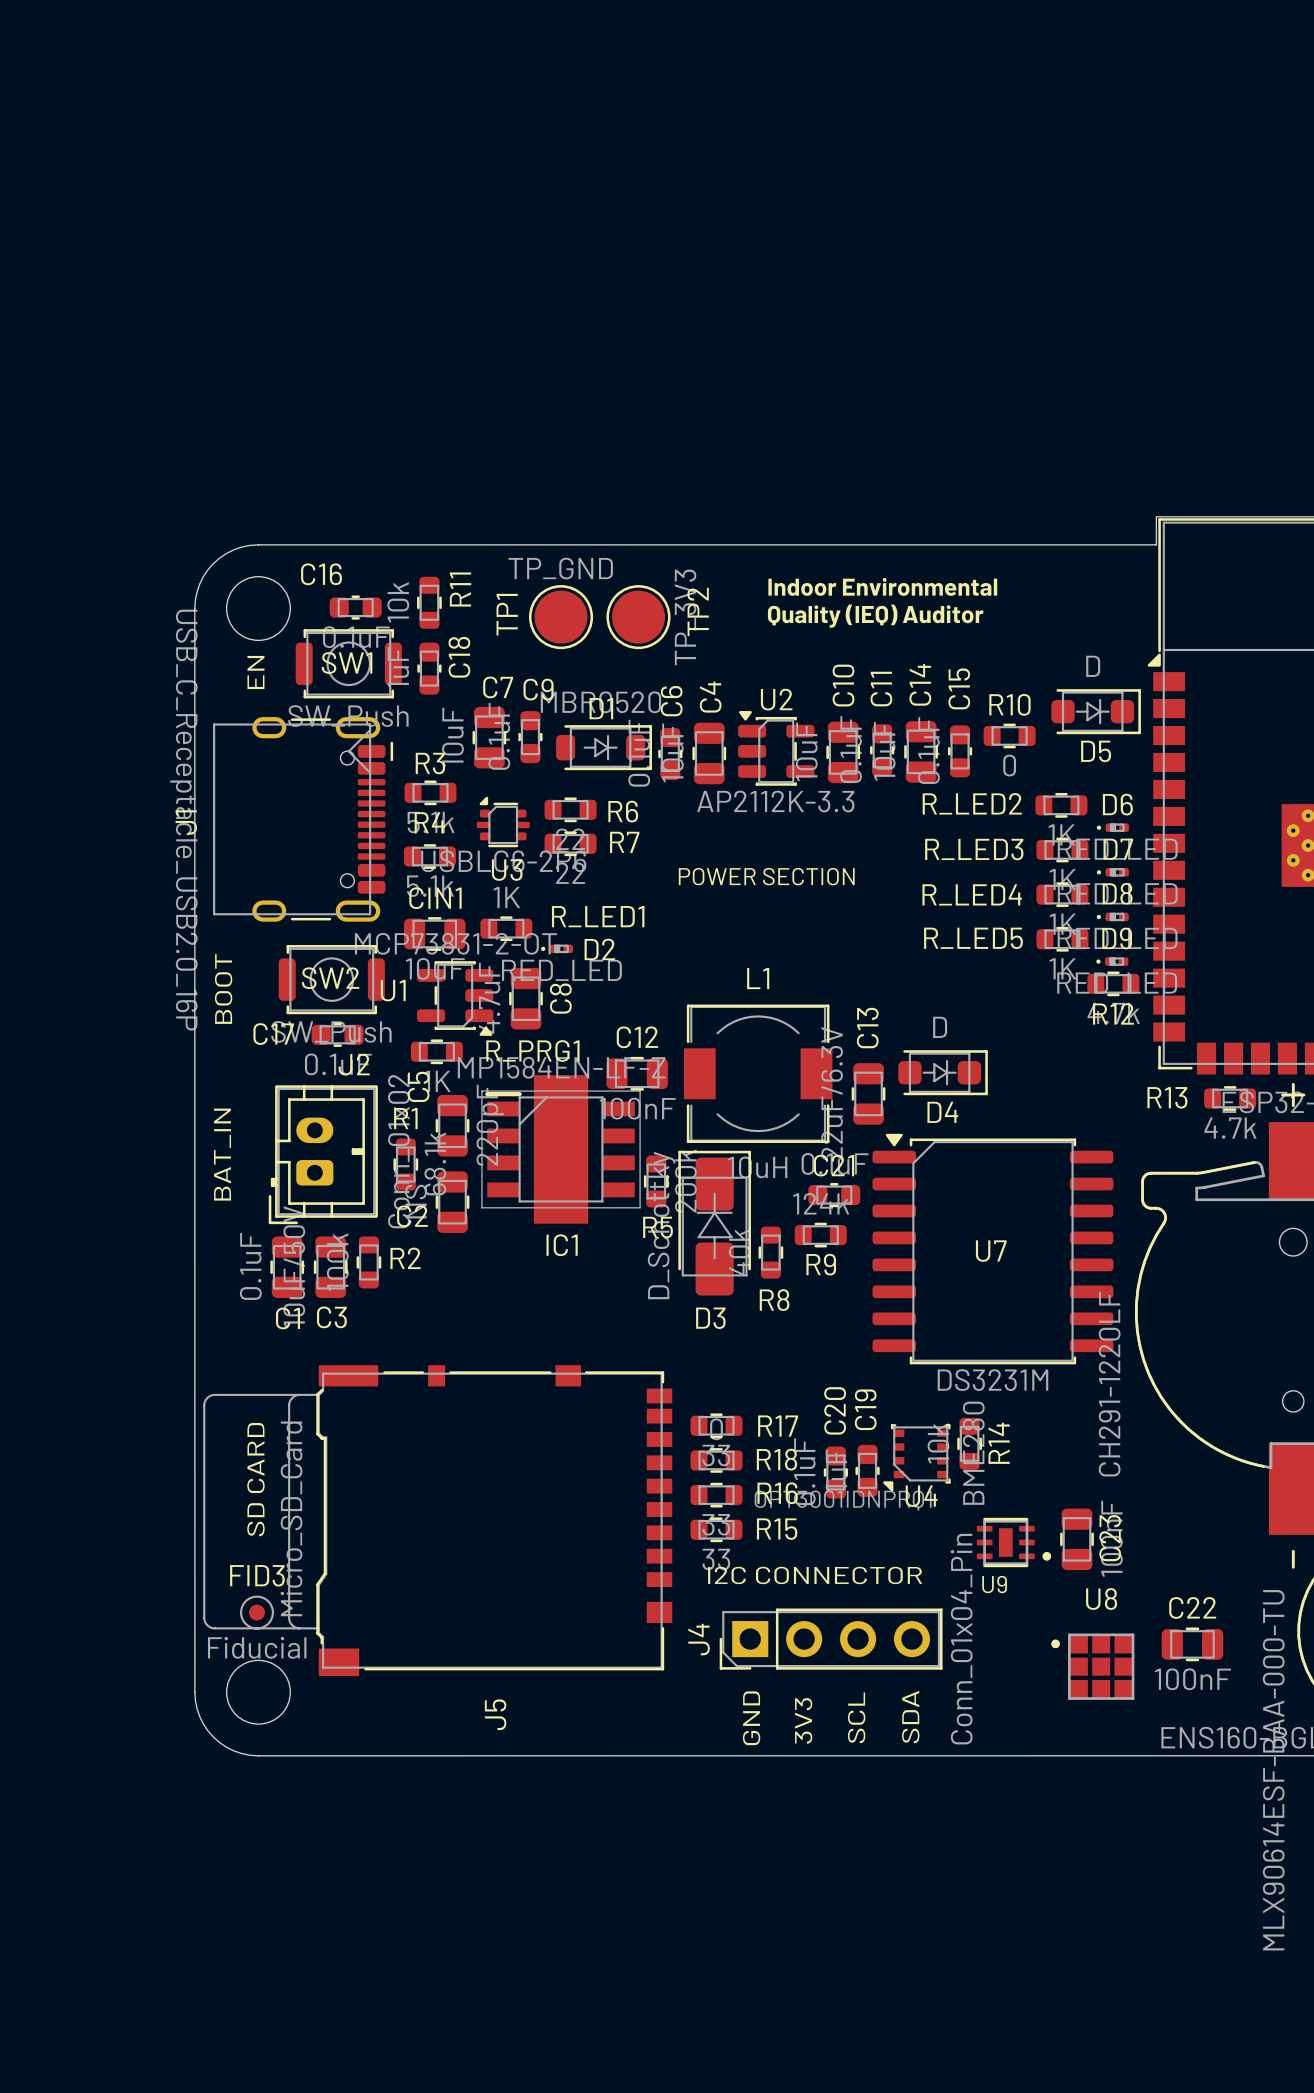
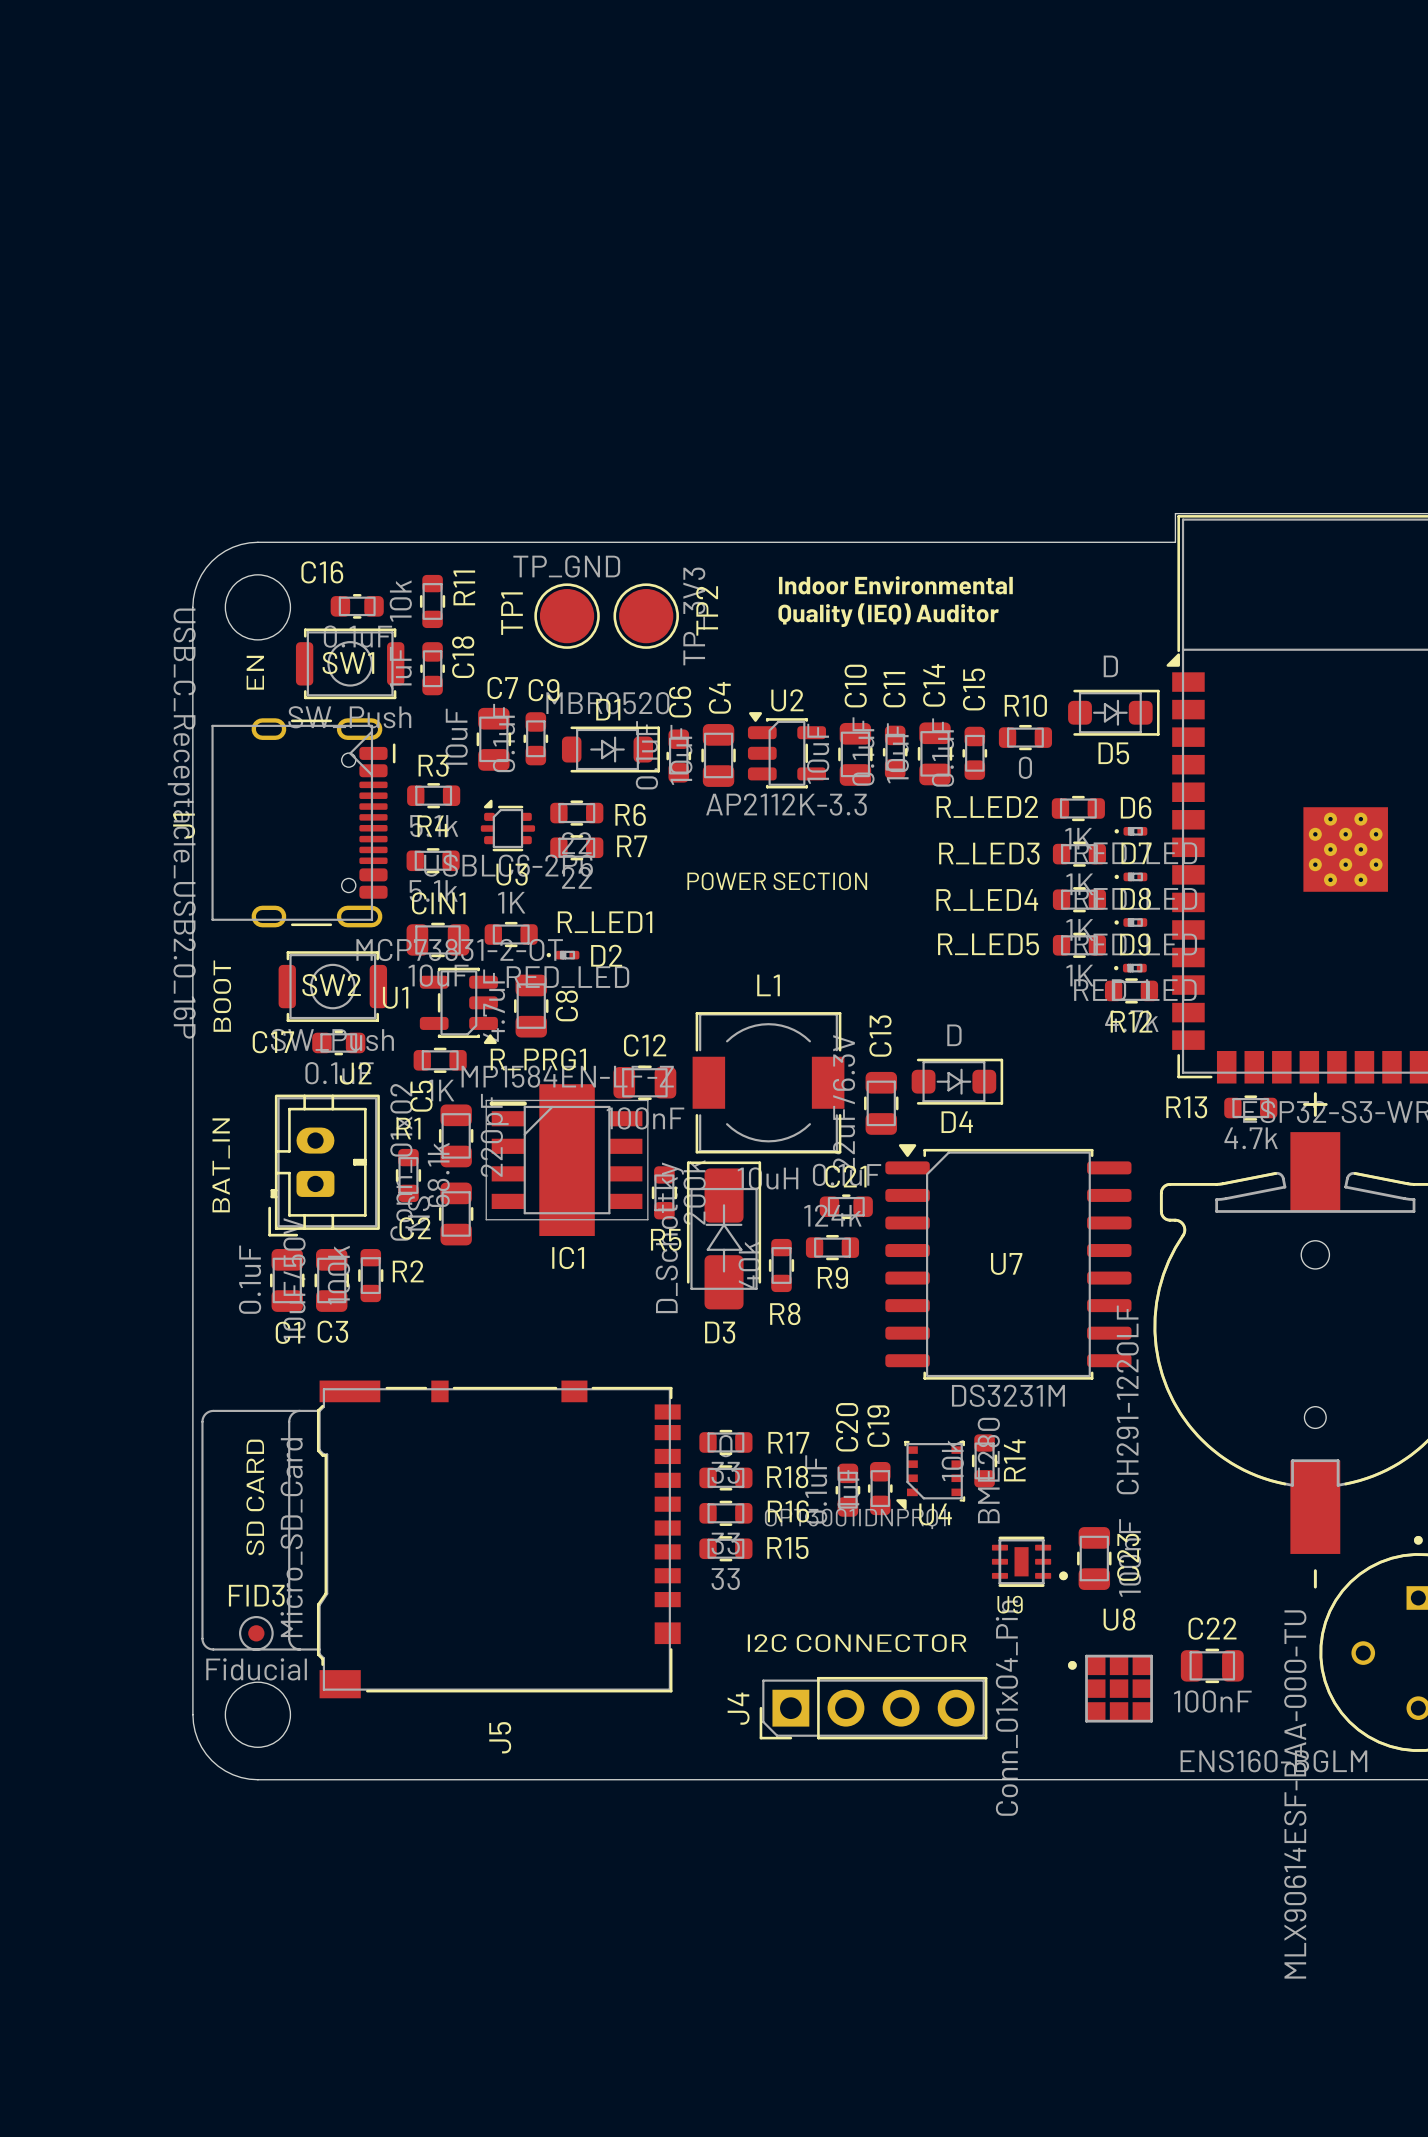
text position: I2C CONNECTOR (815, 1575) -> I2C CONNECTOR (857, 1643)
J4 position: (831, 1639) -> (873, 1708)
text: SCL (856, 1717) -> none
text: SDA (910, 1717) -> none
text: GND (751, 1718) -> none
text: 3V3 (803, 1720) -> none

